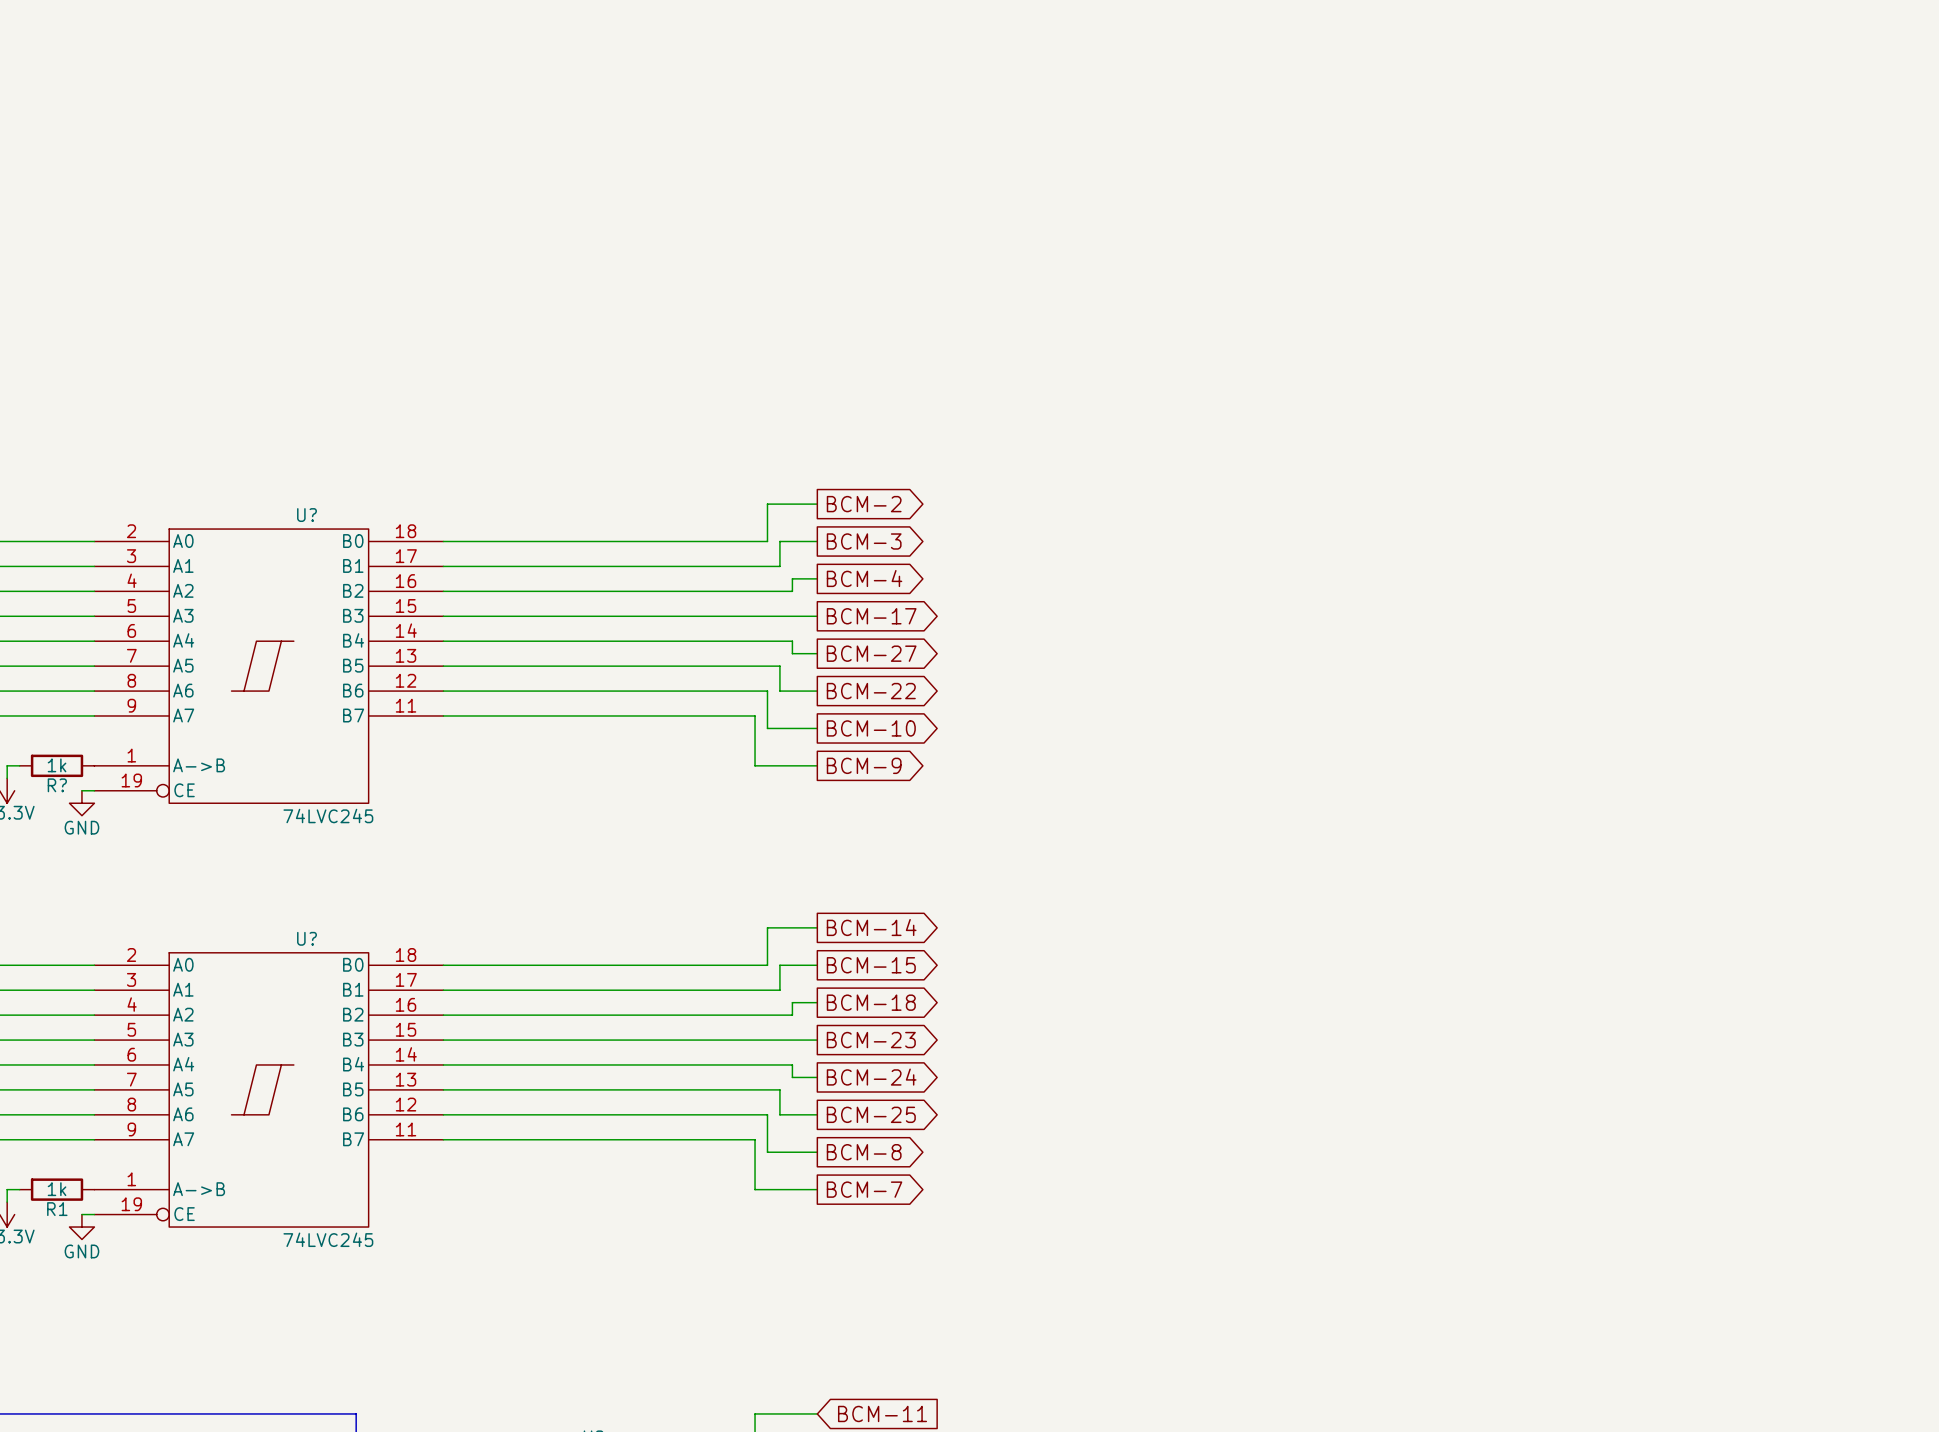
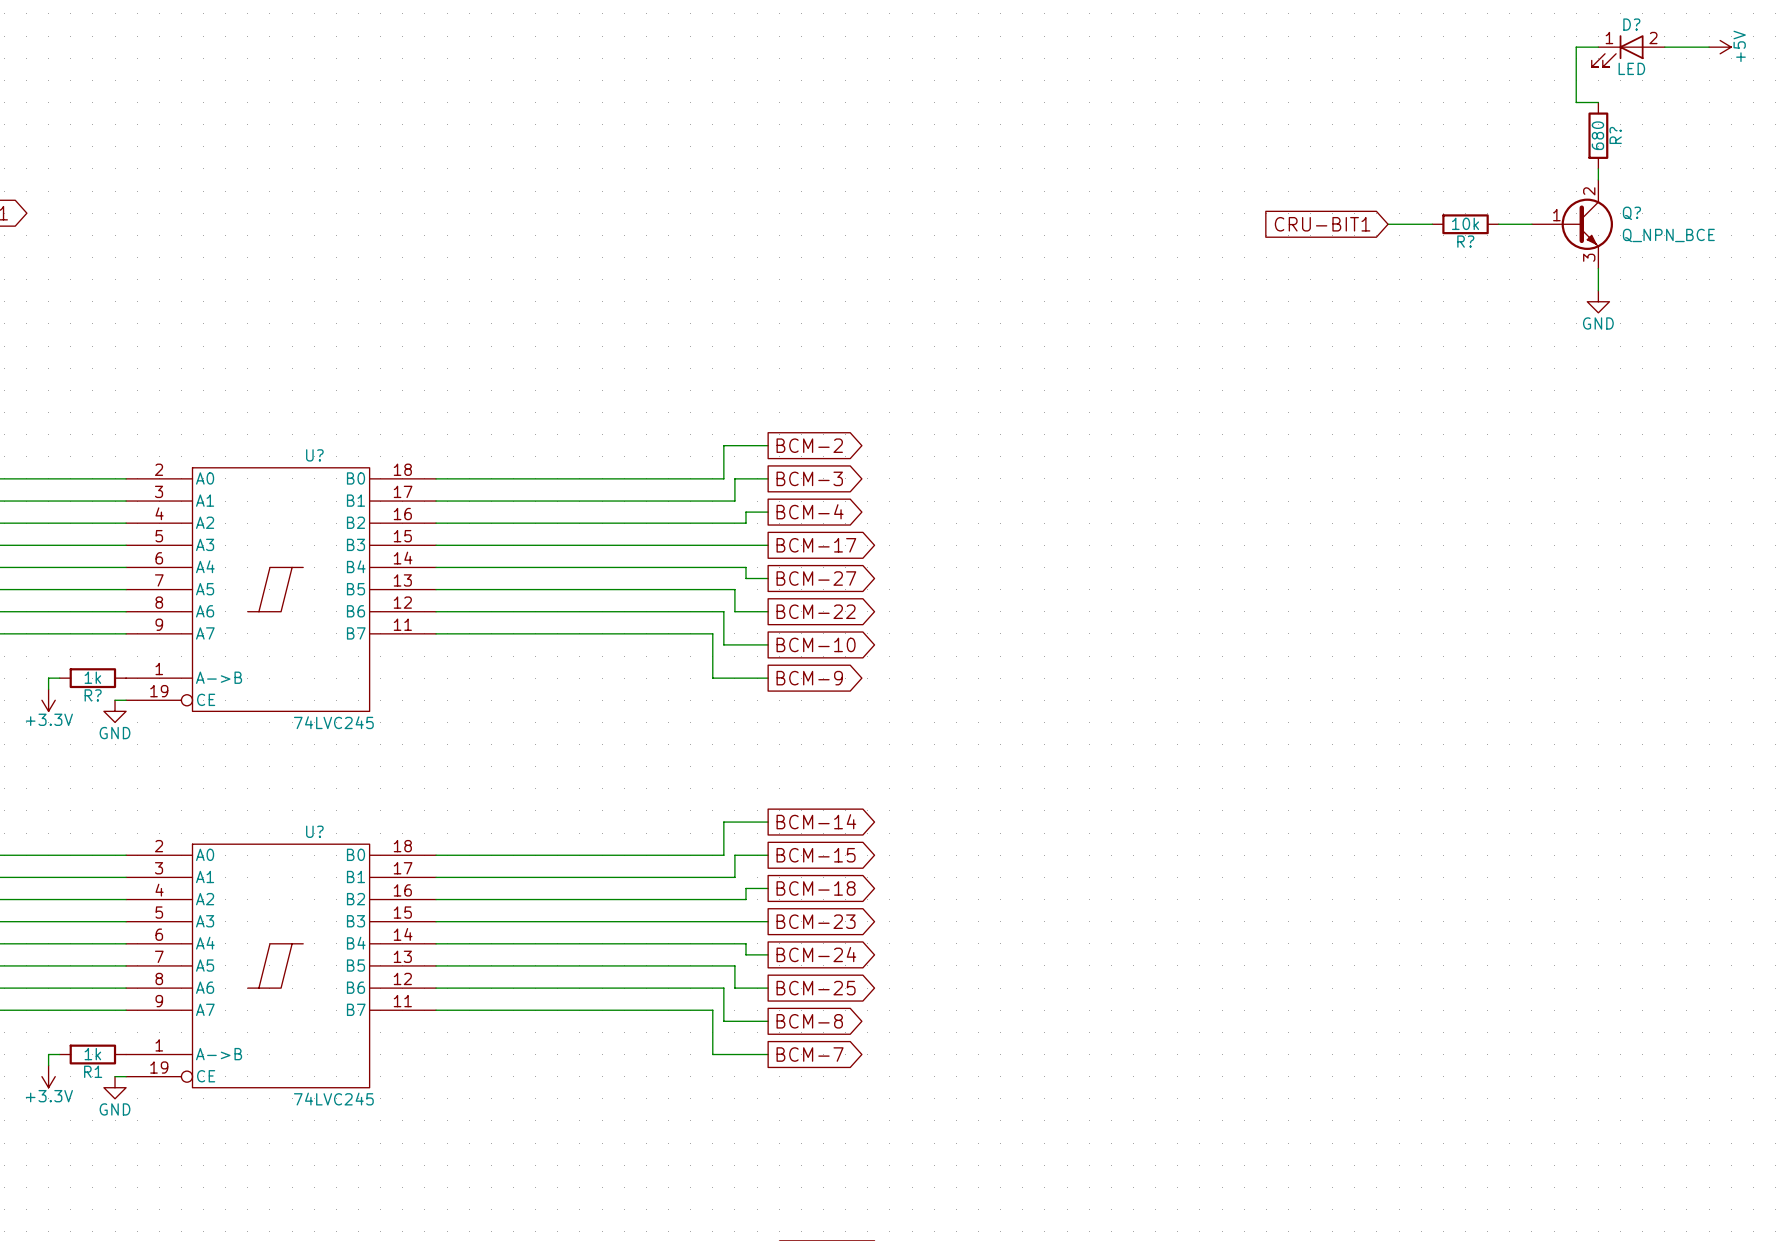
wire: none -> (1598, 47) (1576, 47) (1576, 102) (1598, 102)
wire: none -> (1664, 47) (1709, 47)
power symbol: none -> +5V (1720, 47)
D?: none -> LED (1628, 51)
R?: none -> 680 (1598, 135)
wire: none -> (1598, 168) (1598, 179)
global label: none -> CRU-BIT1 (1322, 224)
wire: none -> (1388, 224) (1432, 224)
R?: none -> 10k (1465, 224)
wire: none -> (1498, 224) (1531, 224)
Q?: none -> Q_NPN_BCE (1572, 224)
wire: none -> (1598, 268) (1598, 290)
power symbol: none -> GND (1598, 301)

